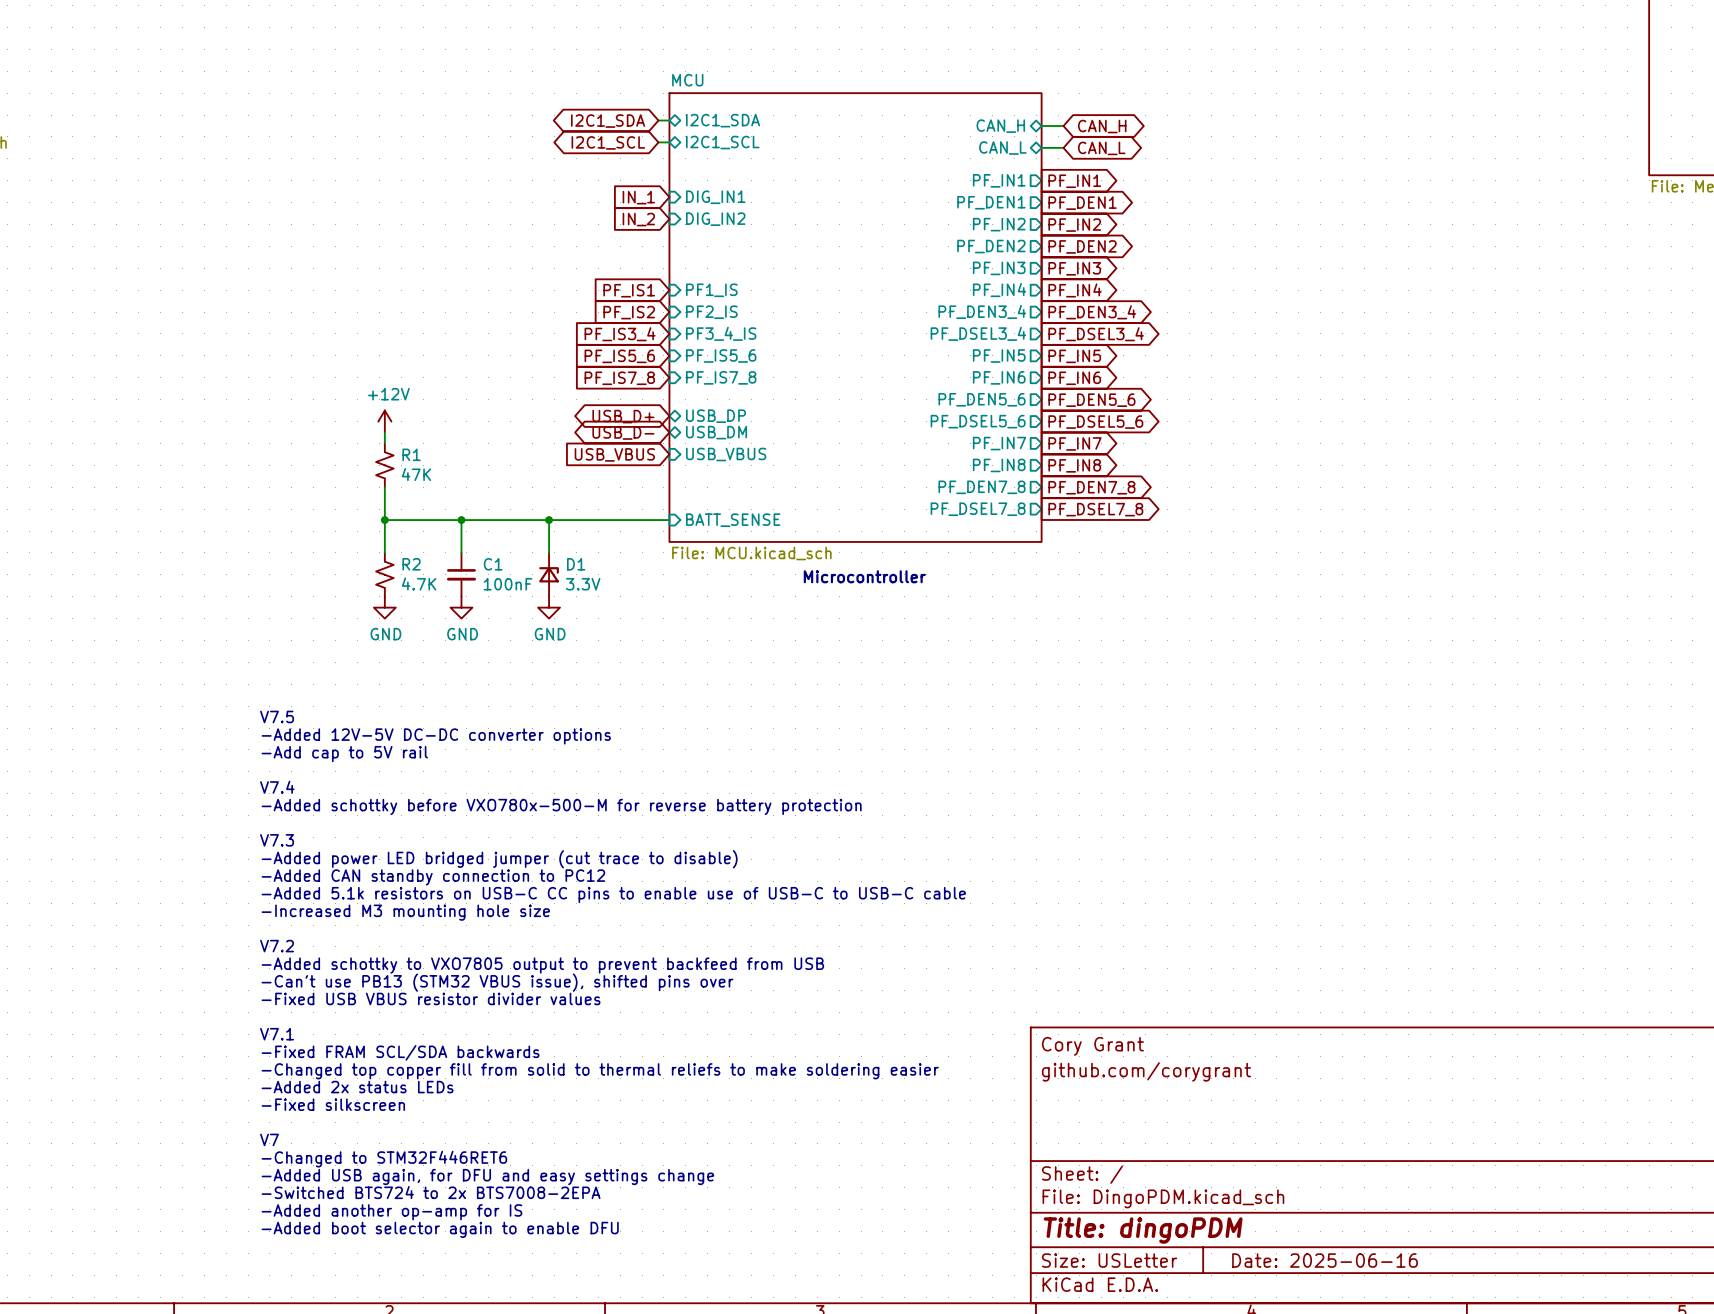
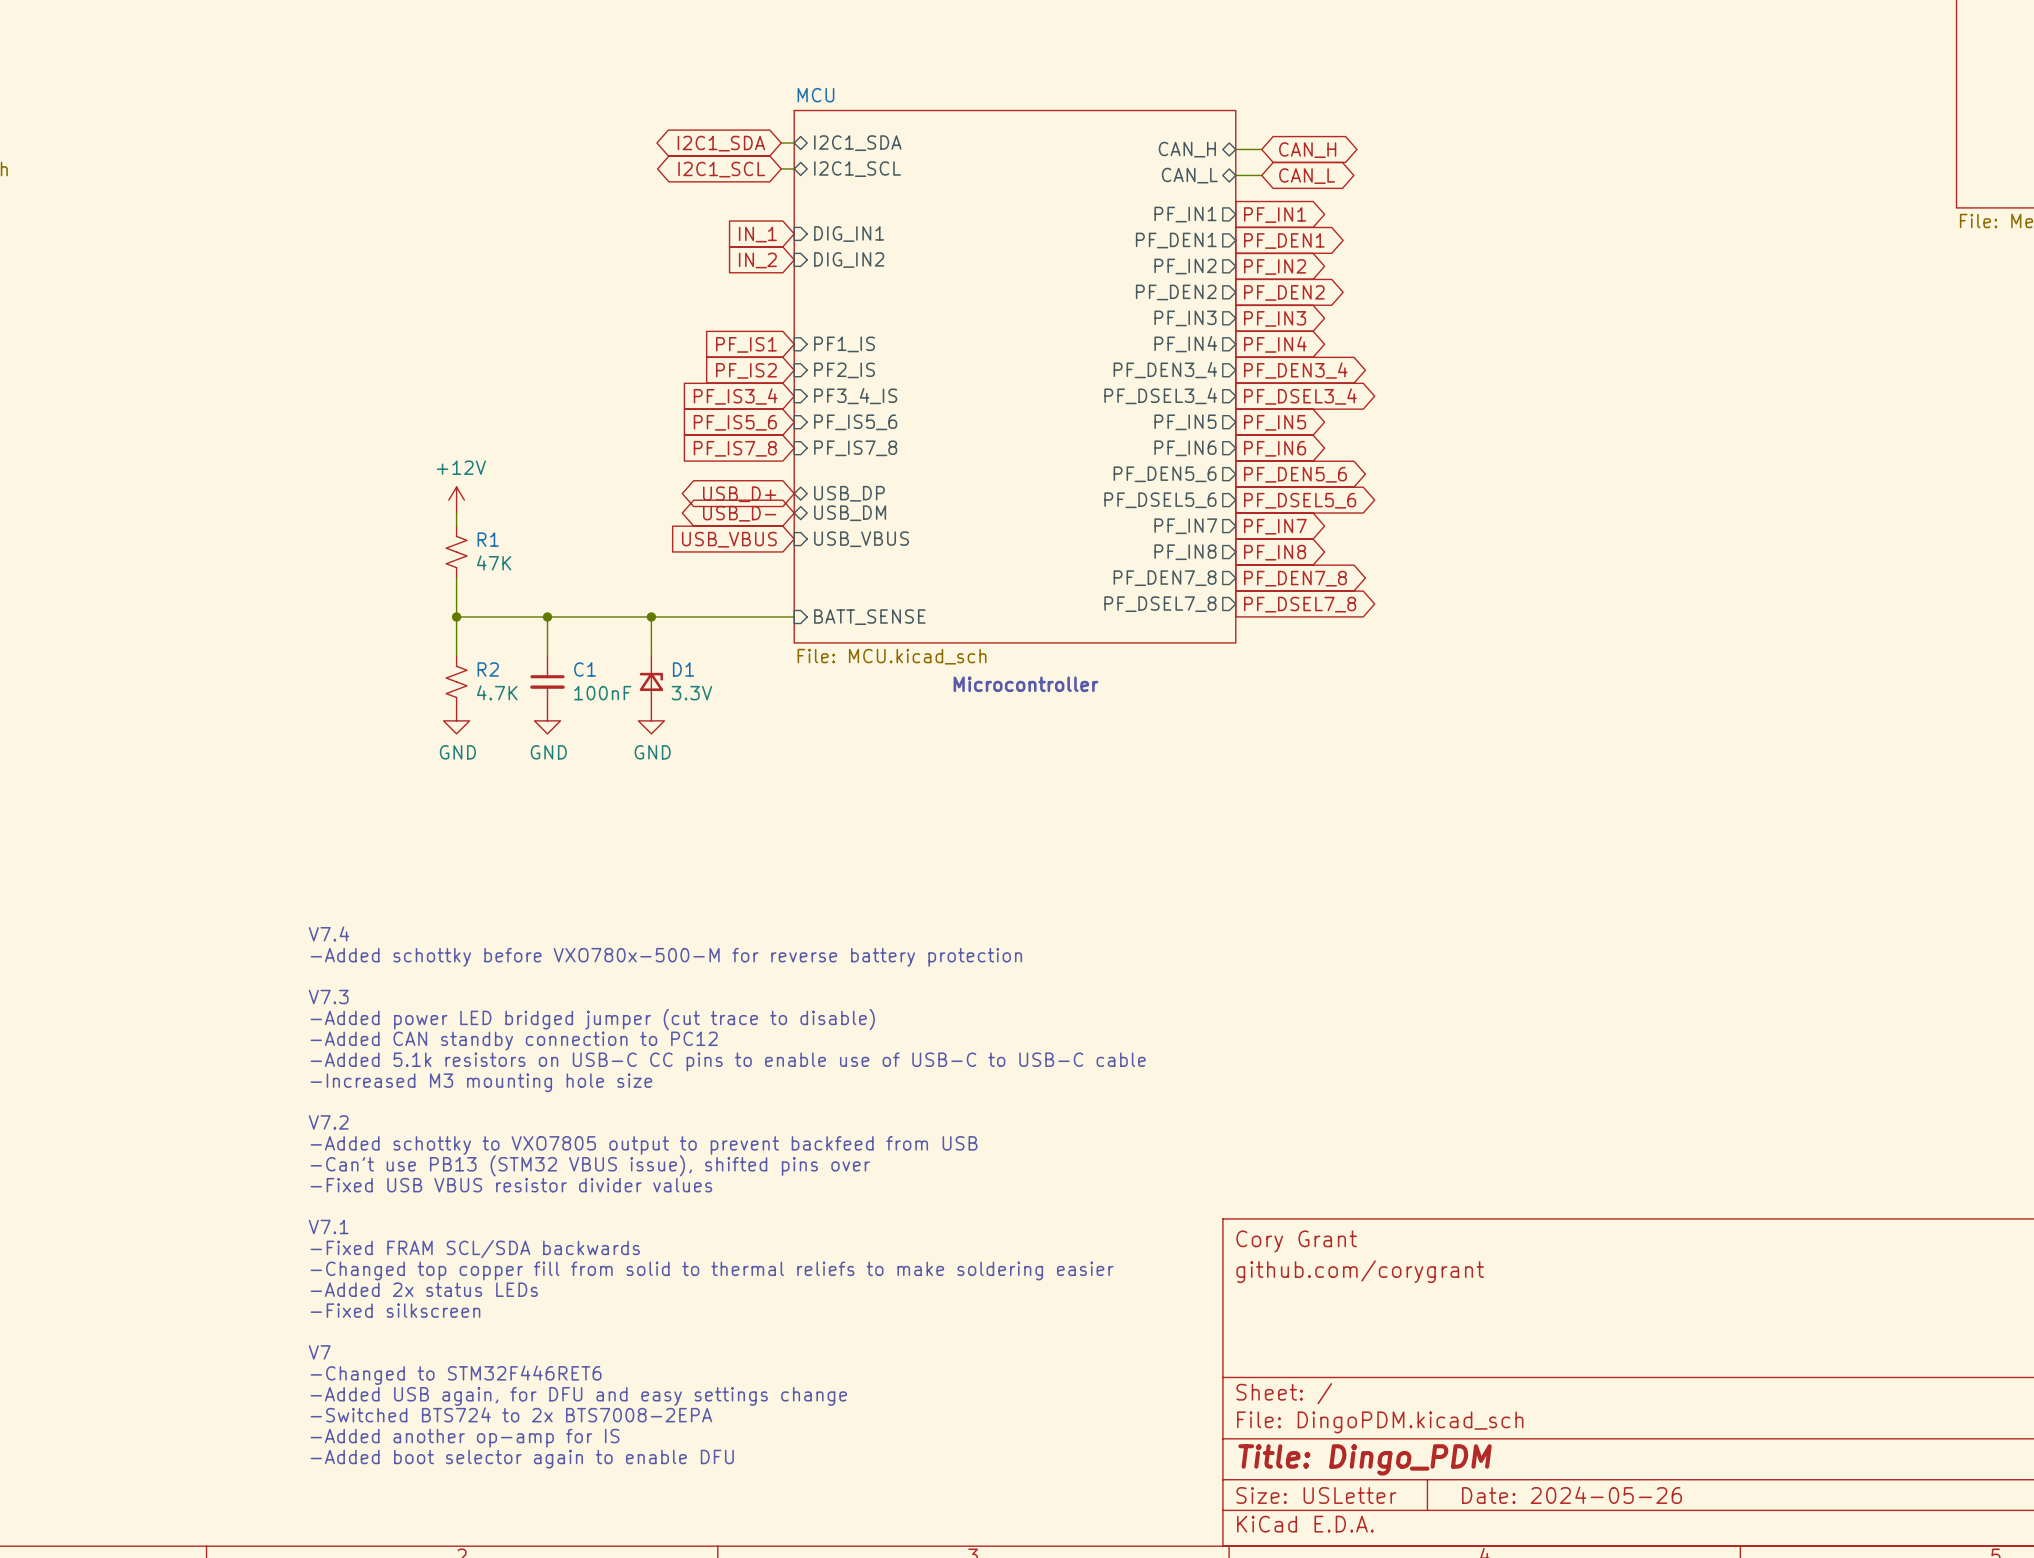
text: V7.5 (277, 716) -> none
text: -Added 12V-5V DC-DC converter options (436, 736) -> none
text: -Add cap to 5V rail (344, 754) -> none
title block: Title: dingoPDM (1143, 1230) -> Title: Dingo_PDM (1365, 1459)
title block: Date: 2025-06-16 (1325, 1260) -> Date: 2024-05-26 (1572, 1495)

